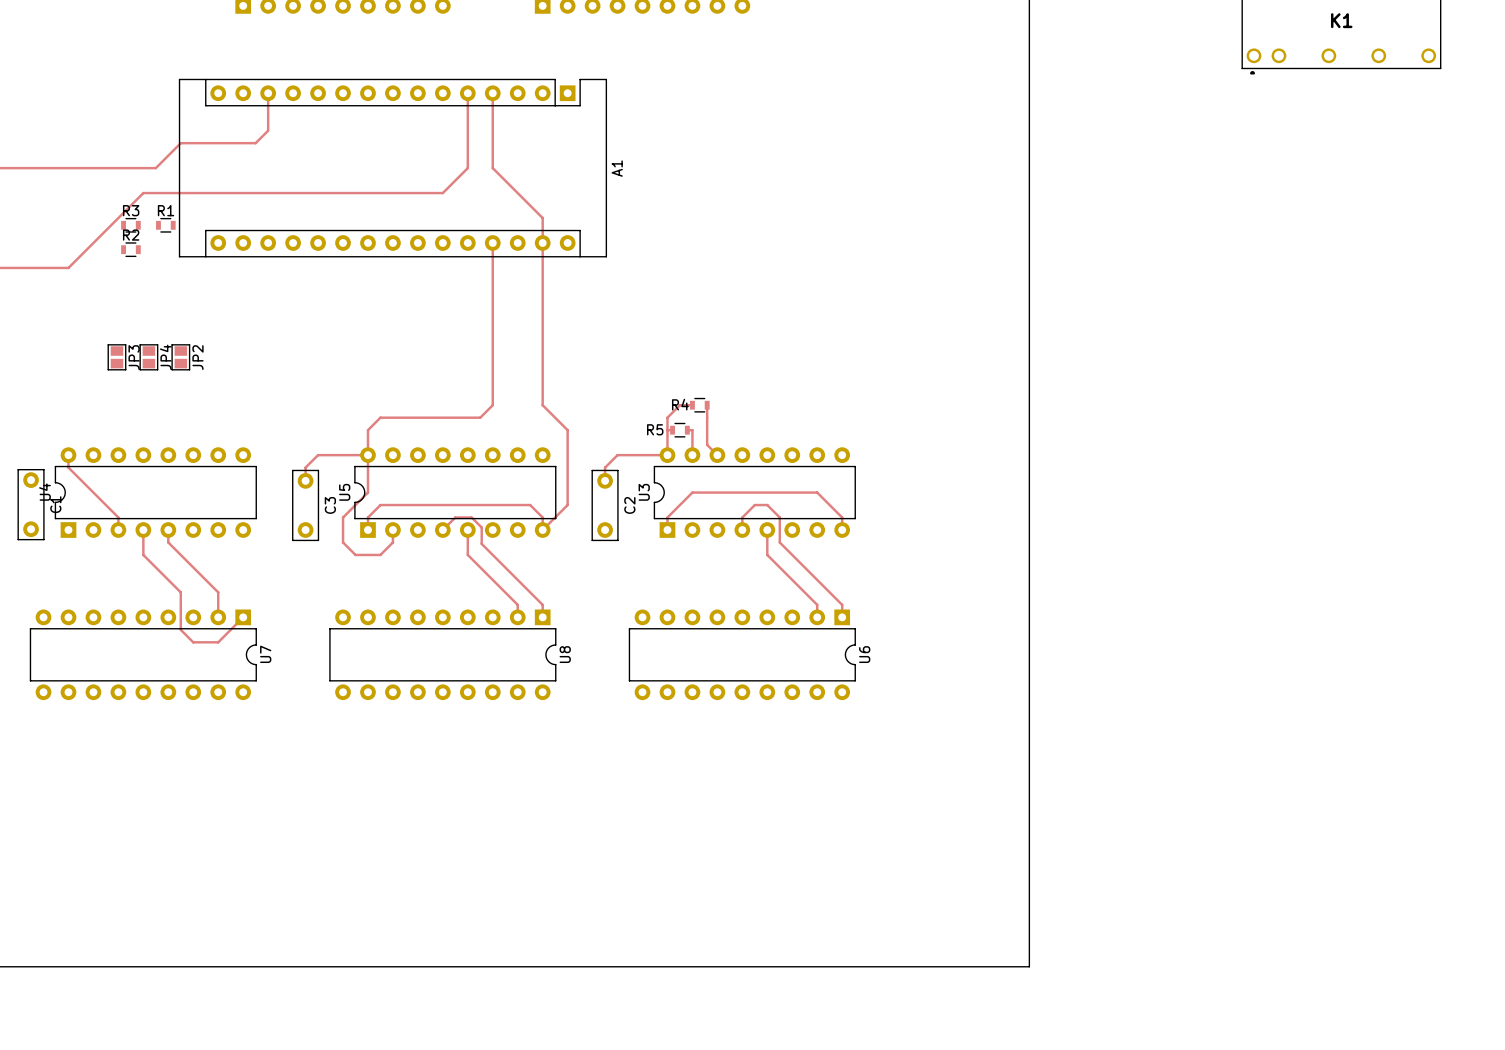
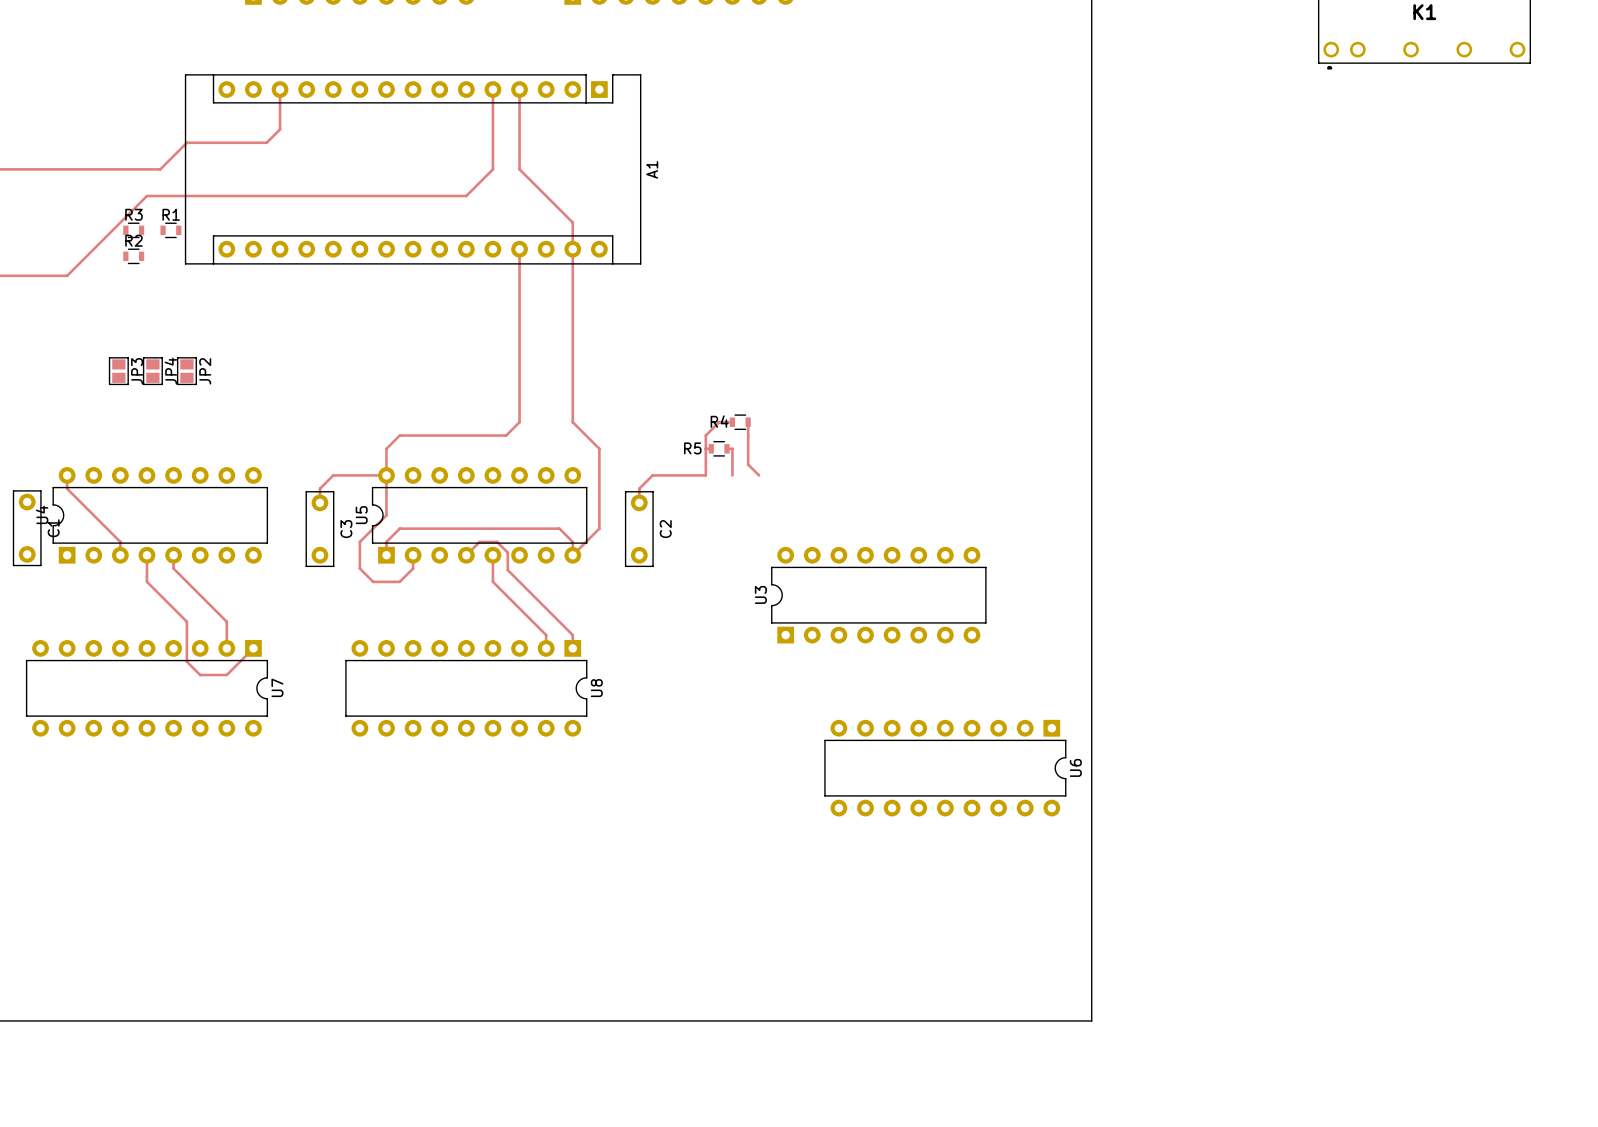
U3 position: (754, 492) -> (878, 595)
track: (667, 530) (667, 517) (692, 492) (817, 492) (842, 517) (842, 530) -> none
track: (742, 530) (742, 517) (754, 505) (767, 505) (779, 517) (779, 542) (842, 604) (842, 617) -> none
track: (767, 530) (767, 554) (817, 604) (817, 617) -> none
U6 position: (742, 654) -> (945, 768)

